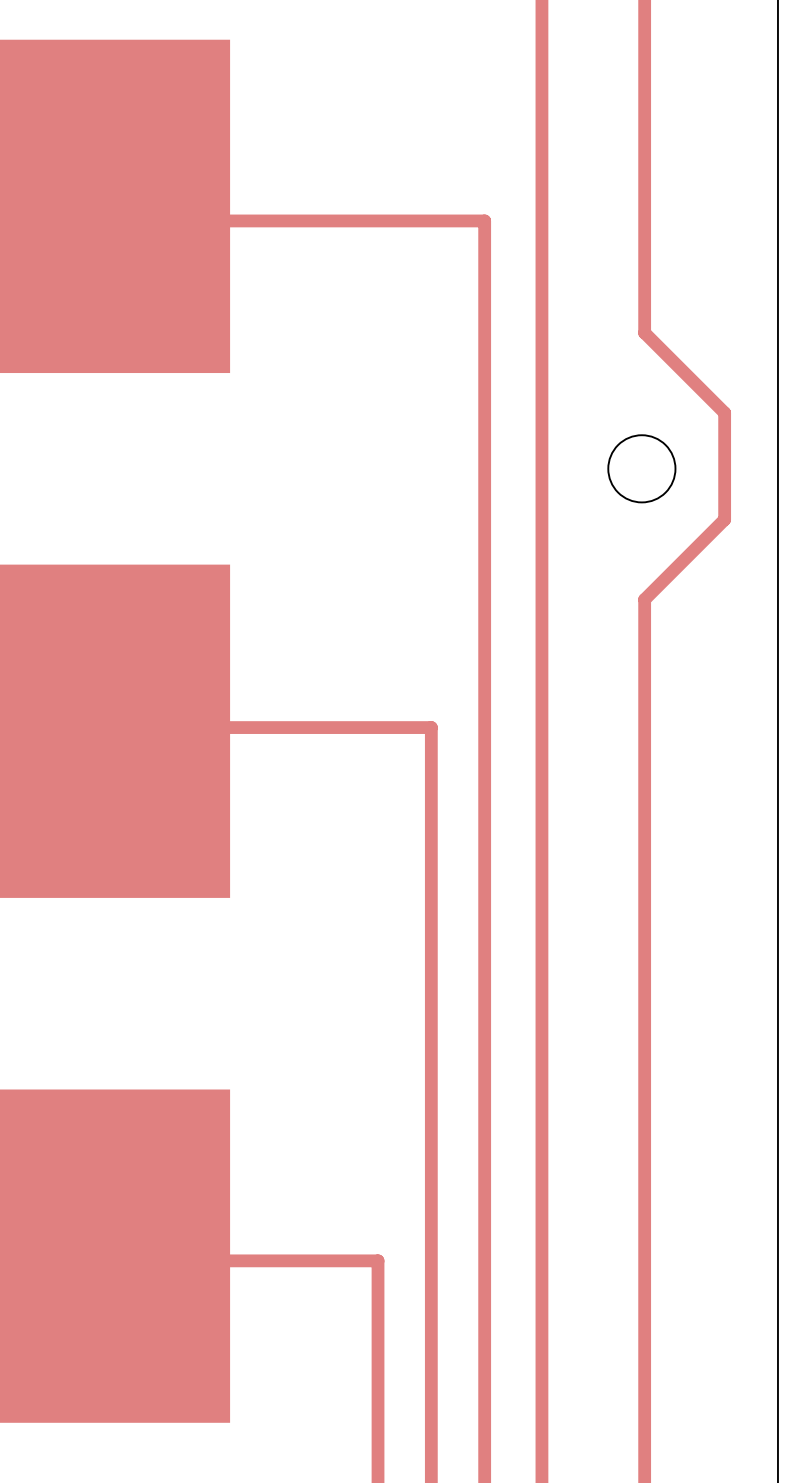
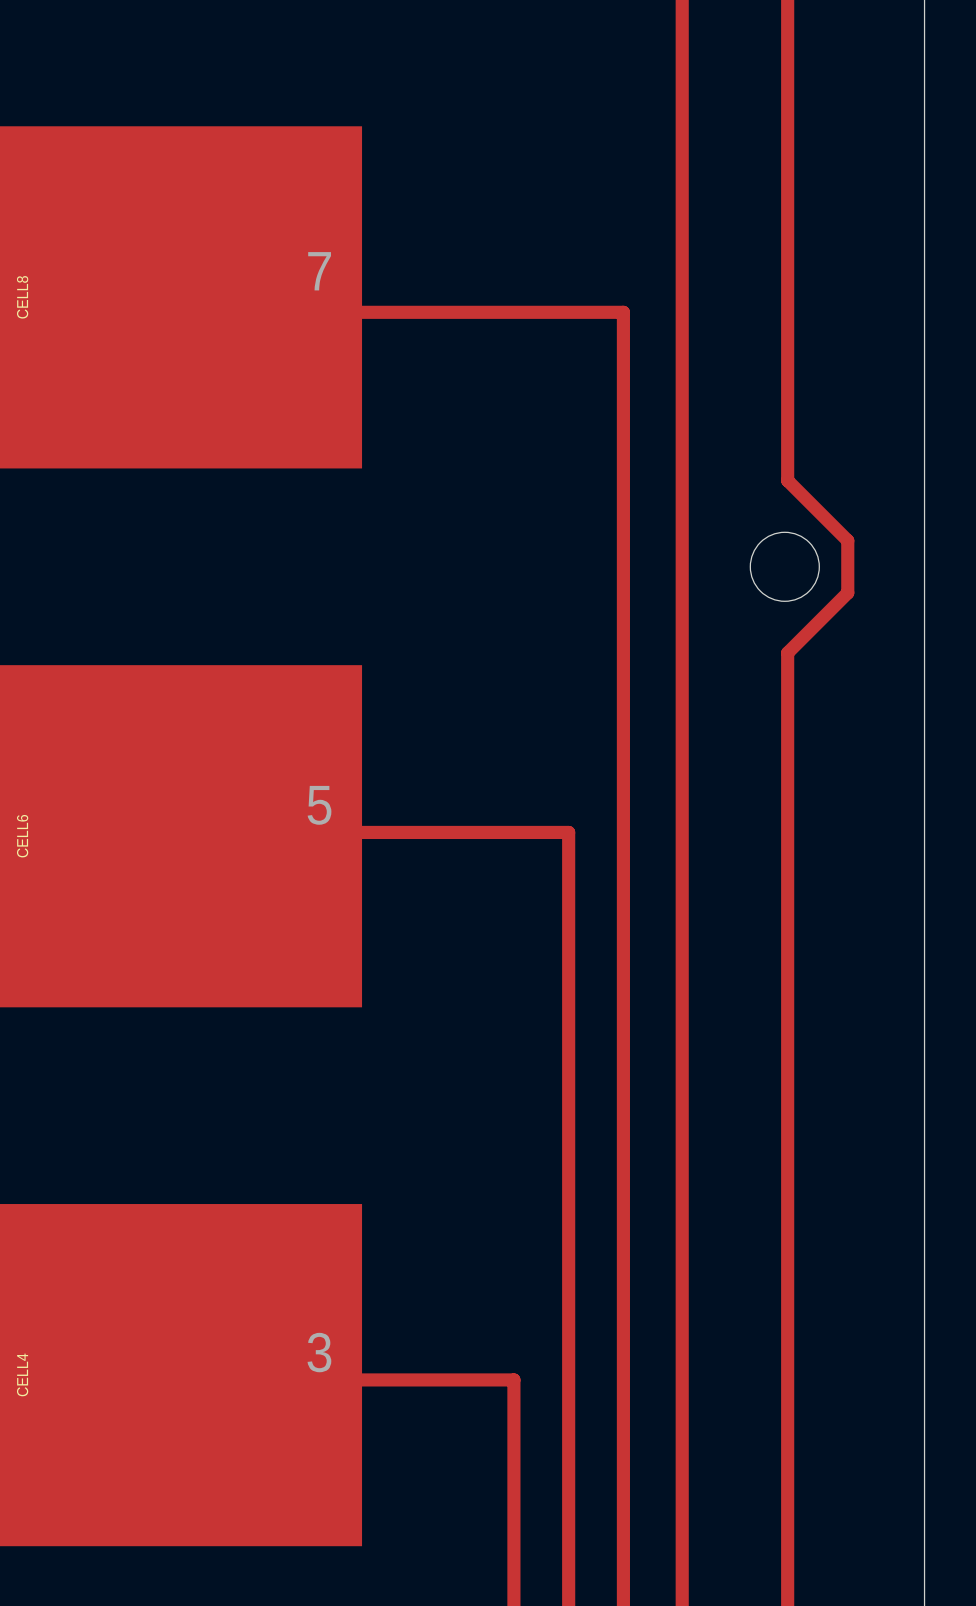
text: none -> 7 (319, 271)
top track: (644, 332) (724, 412) (724, 519) (644, 599) -> (787, 427) (787, 480) (847, 540) (847, 592) (787, 652) (787, 701)
text: none -> 5 (319, 805)
text: none -> 3 (319, 1352)

